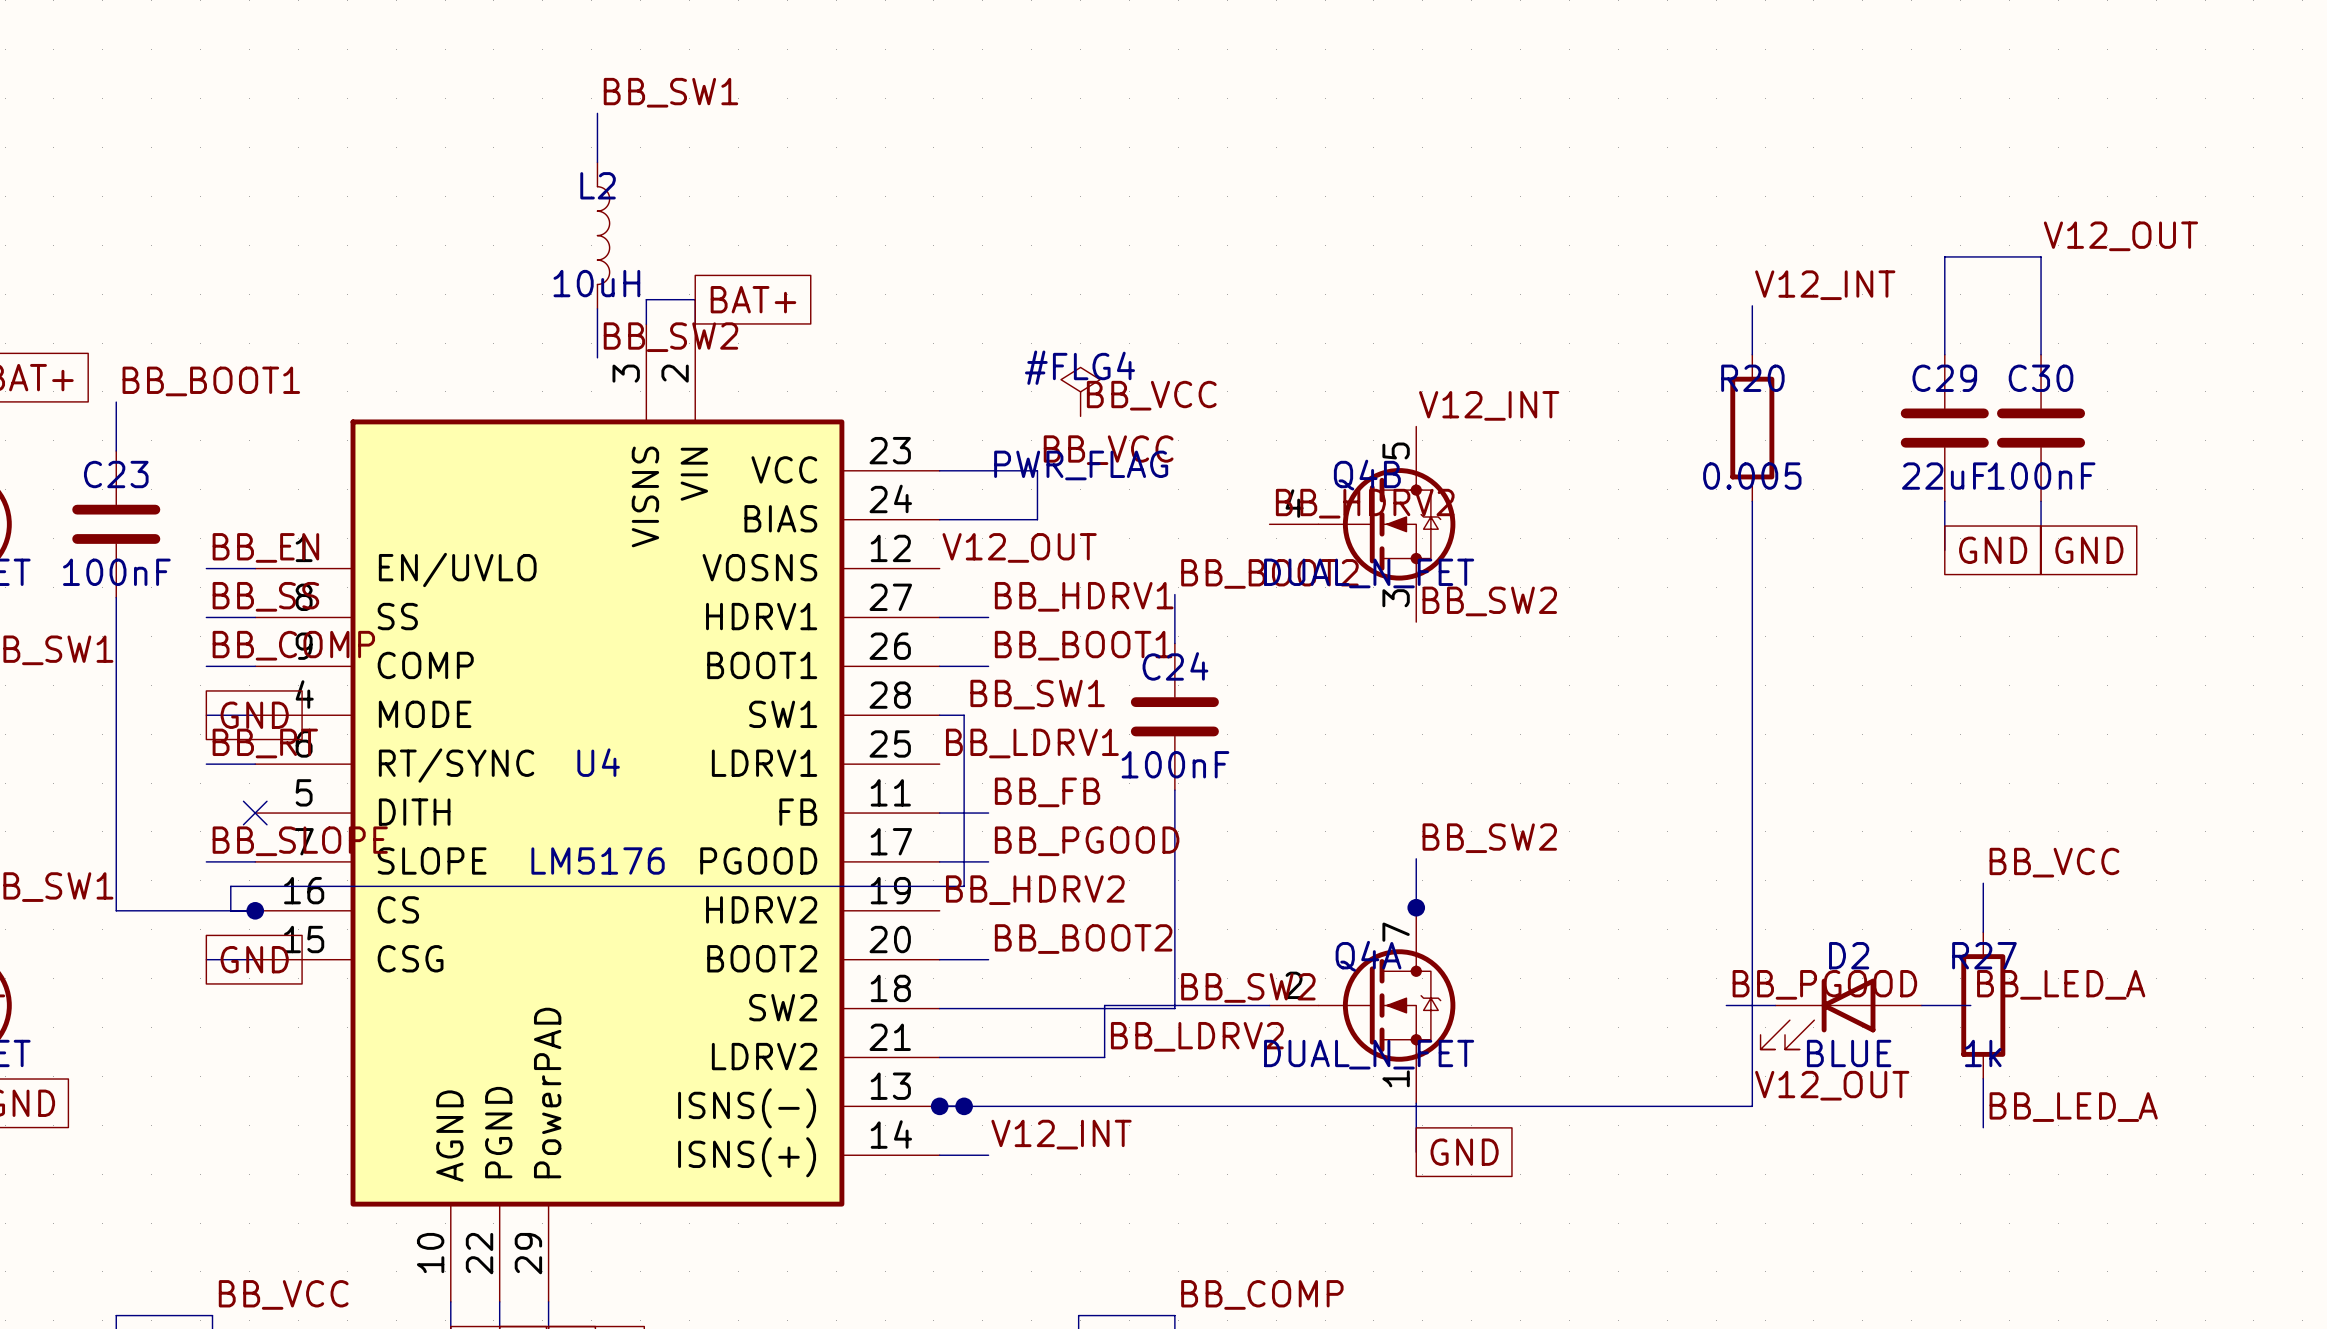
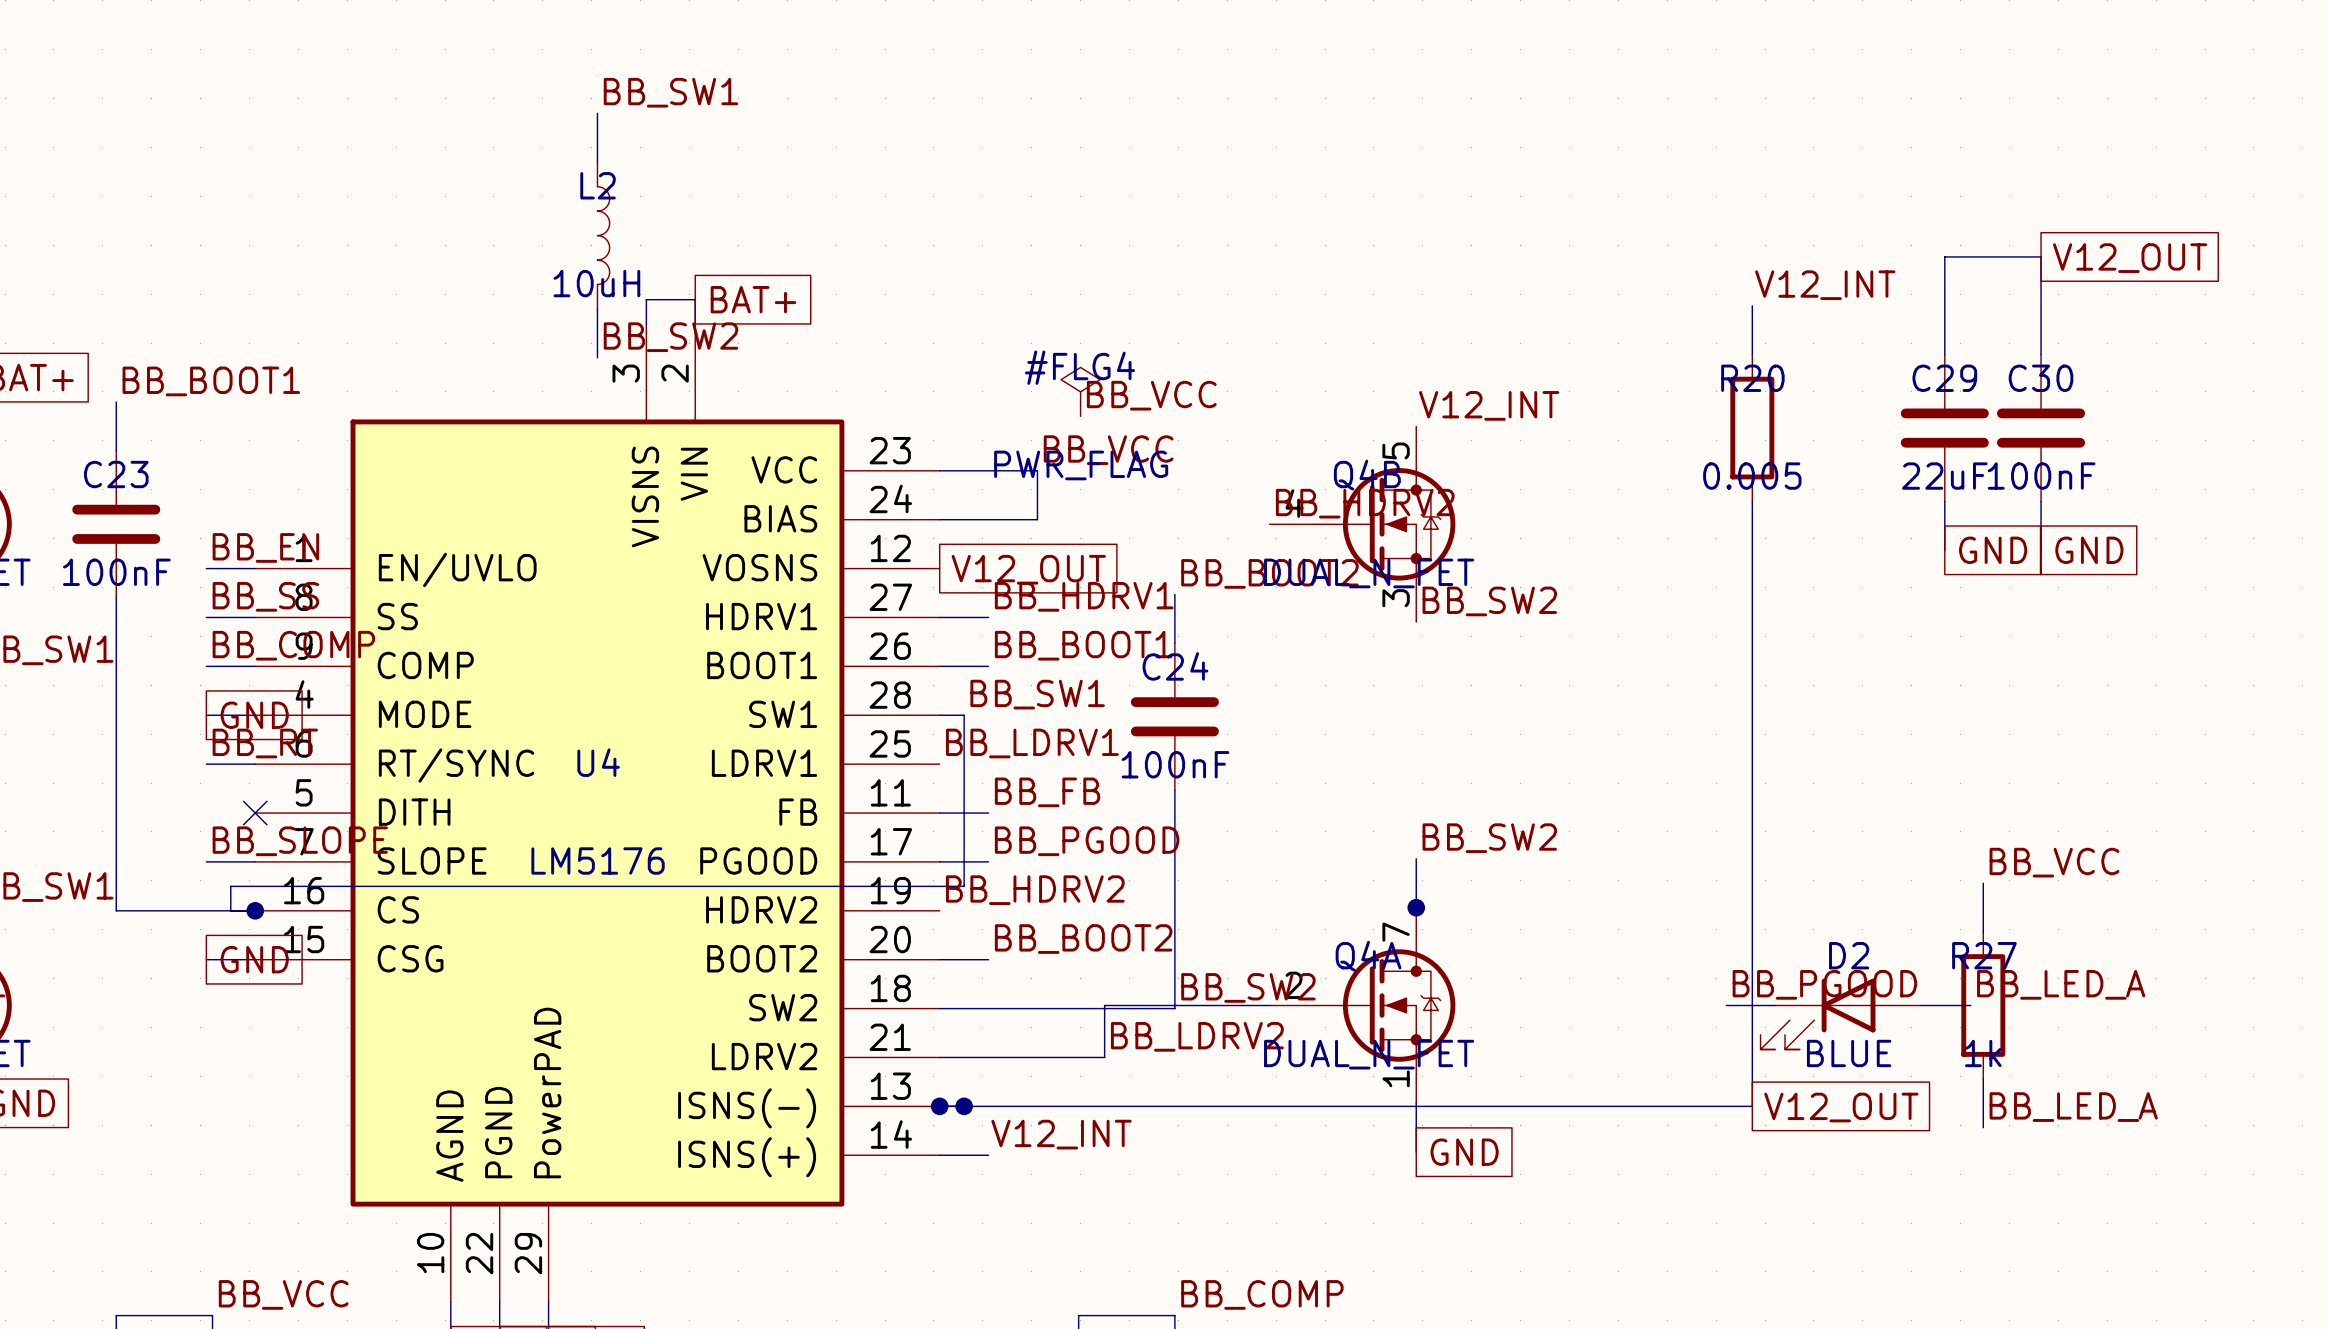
label: V12_OUT (2120, 236) -> none
global label: none -> V12_OUT (2130, 258)
label: V12_OUT (1019, 547) -> none
global label: none -> V12_OUT (1028, 569)
label: V12_OUT (1832, 1085) -> none
global label: none -> V12_OUT (1841, 1107)

